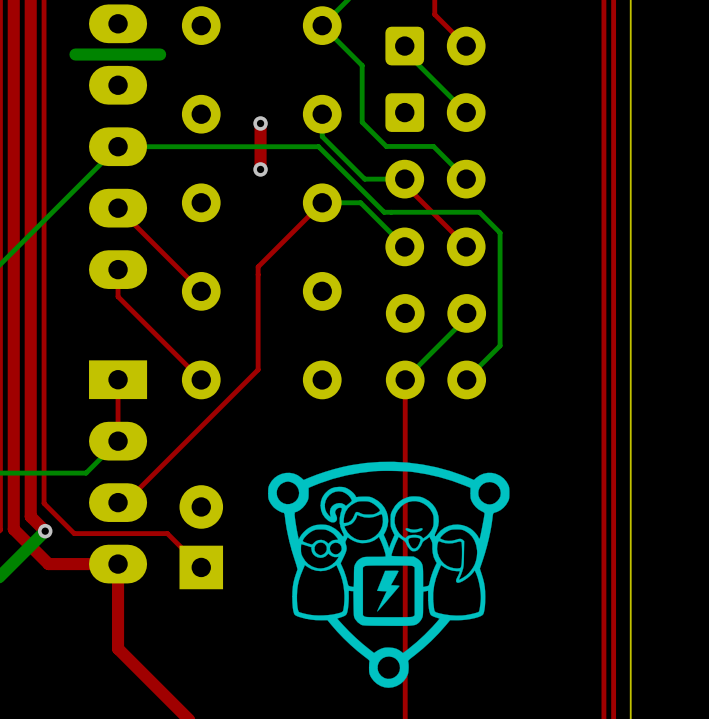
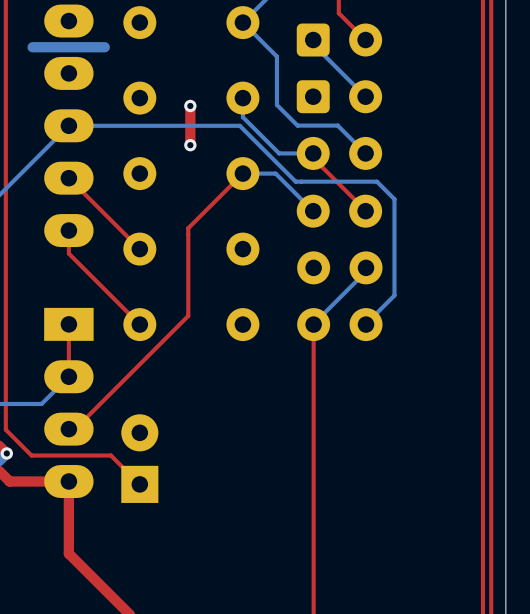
drawing: [268, 461, 510, 688] -> none

